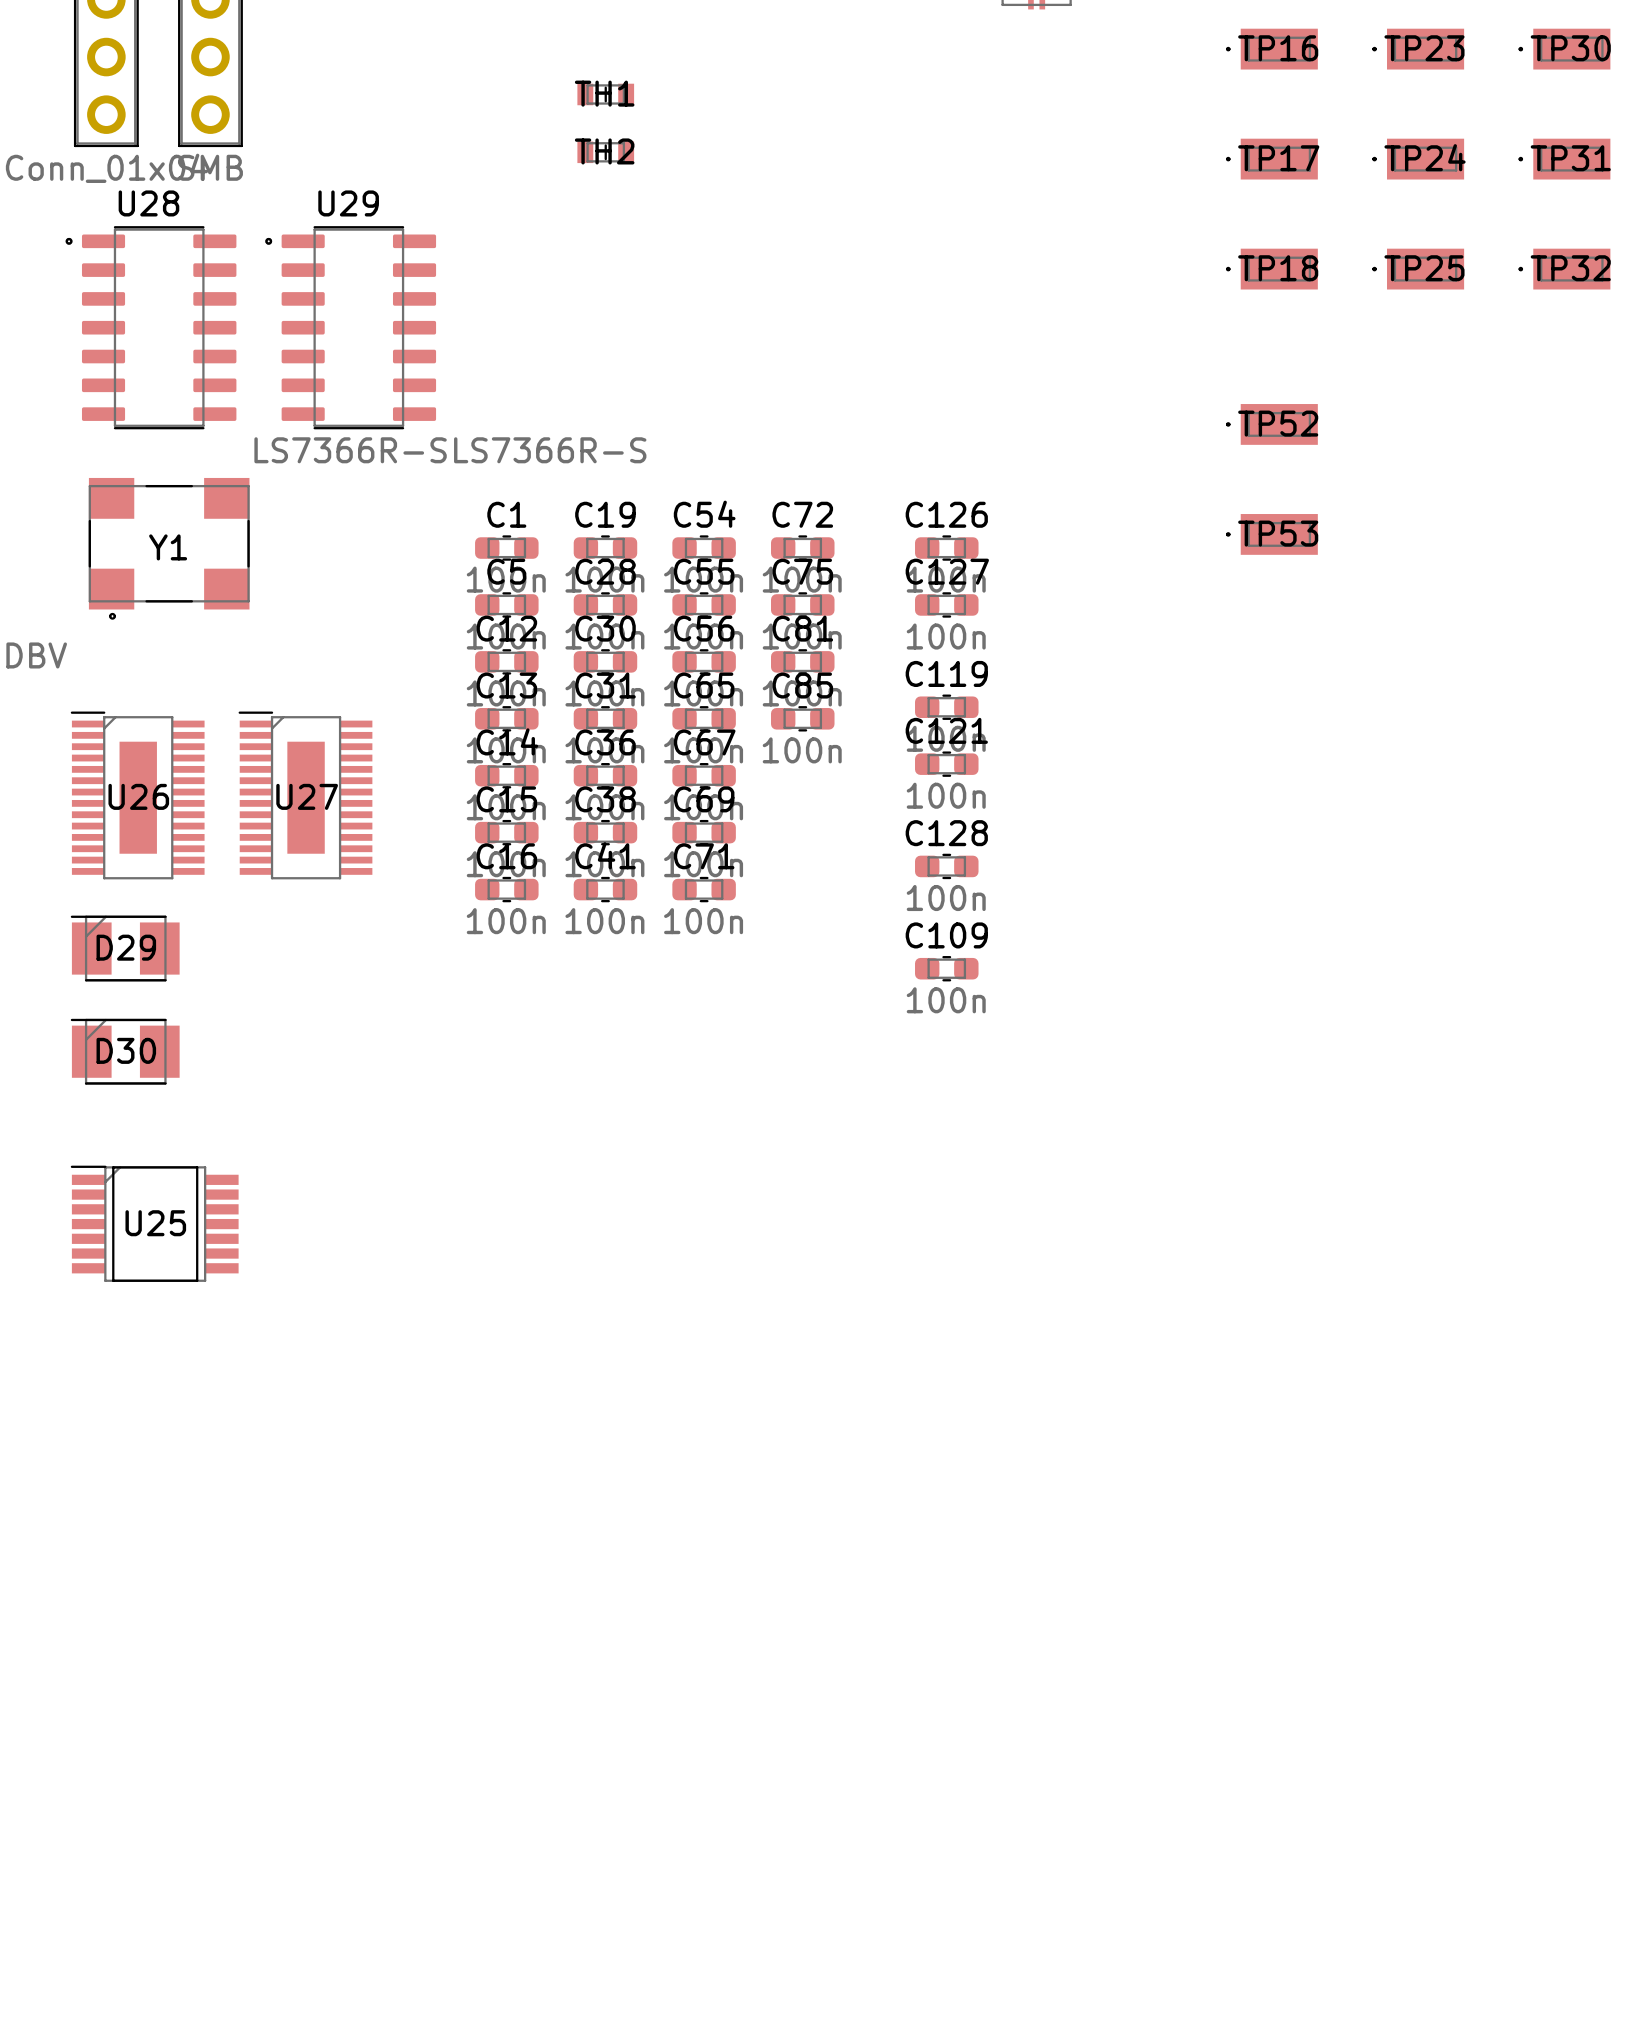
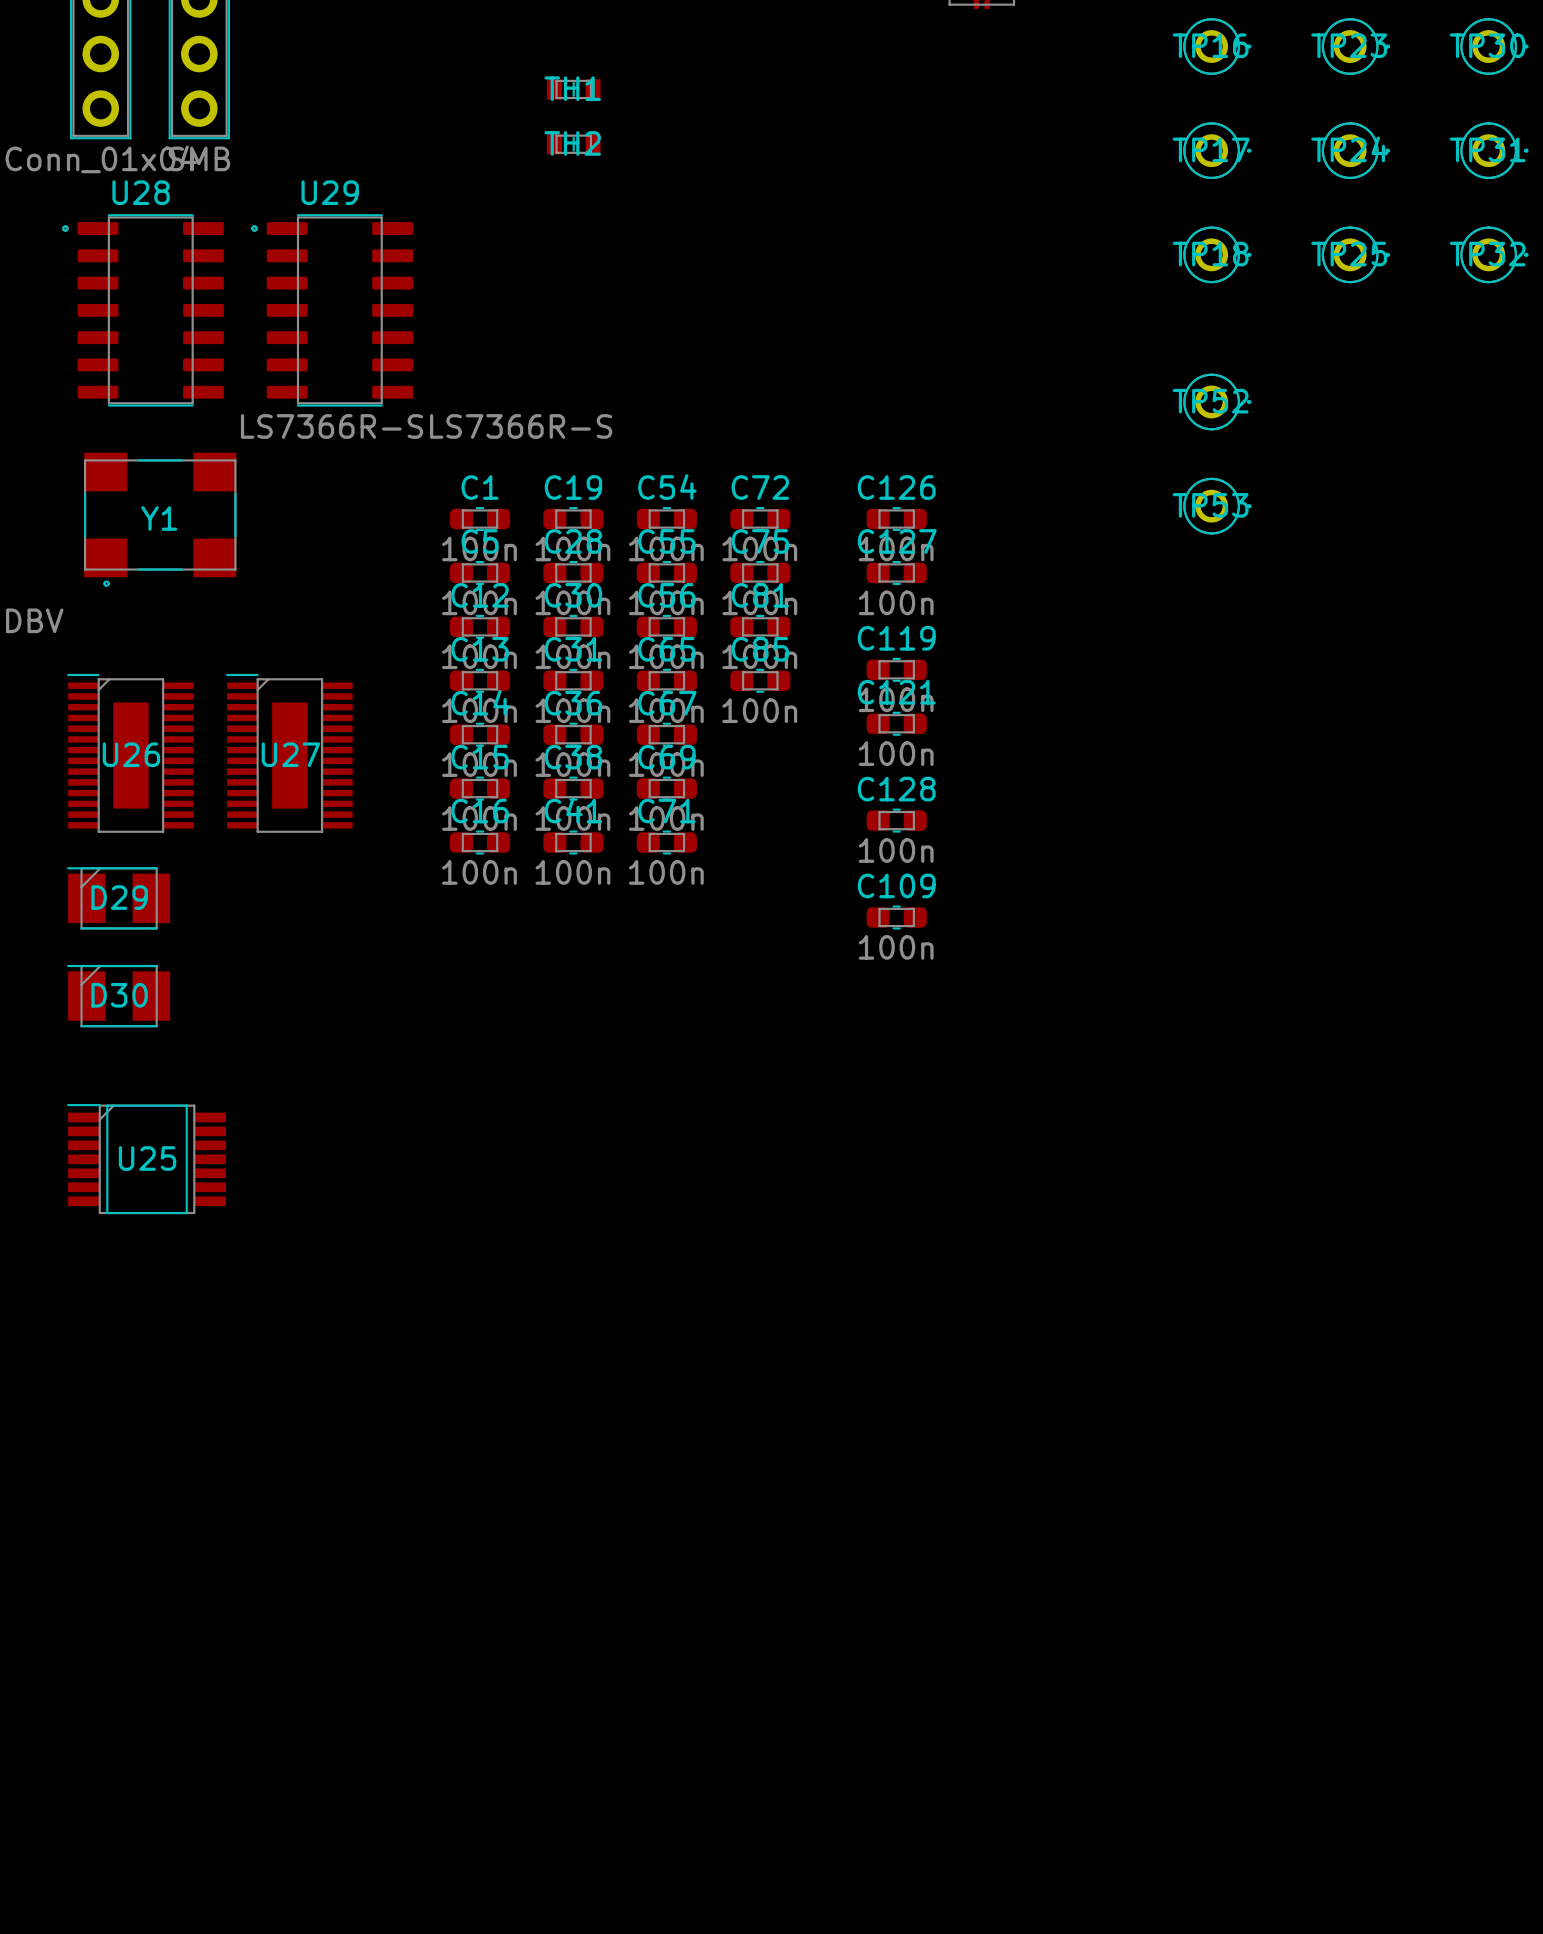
TP16 footprint: [1225, 28, 1318, 70] -> [1183, 18, 1252, 75]
TP23 footprint: [1372, 28, 1465, 70] -> [1321, 18, 1390, 75]
TP30 footprint: [1518, 28, 1611, 70] -> [1460, 18, 1529, 75]
TP17 footprint: [1225, 138, 1318, 180] -> [1183, 122, 1252, 180]
TP24 footprint: [1372, 138, 1465, 180] -> [1321, 122, 1390, 180]
TP31 footprint: [1518, 138, 1611, 180] -> [1460, 122, 1529, 180]
TP18 footprint: [1225, 248, 1318, 290] -> [1183, 226, 1252, 284]
TP25 footprint: [1372, 248, 1465, 290] -> [1321, 226, 1390, 284]
TP32 footprint: [1518, 248, 1611, 290] -> [1460, 226, 1529, 284]
TP52 footprint: [1225, 404, 1318, 445] -> [1183, 373, 1252, 431]
TP53 footprint: [1225, 514, 1318, 555] -> [1183, 477, 1252, 535]

